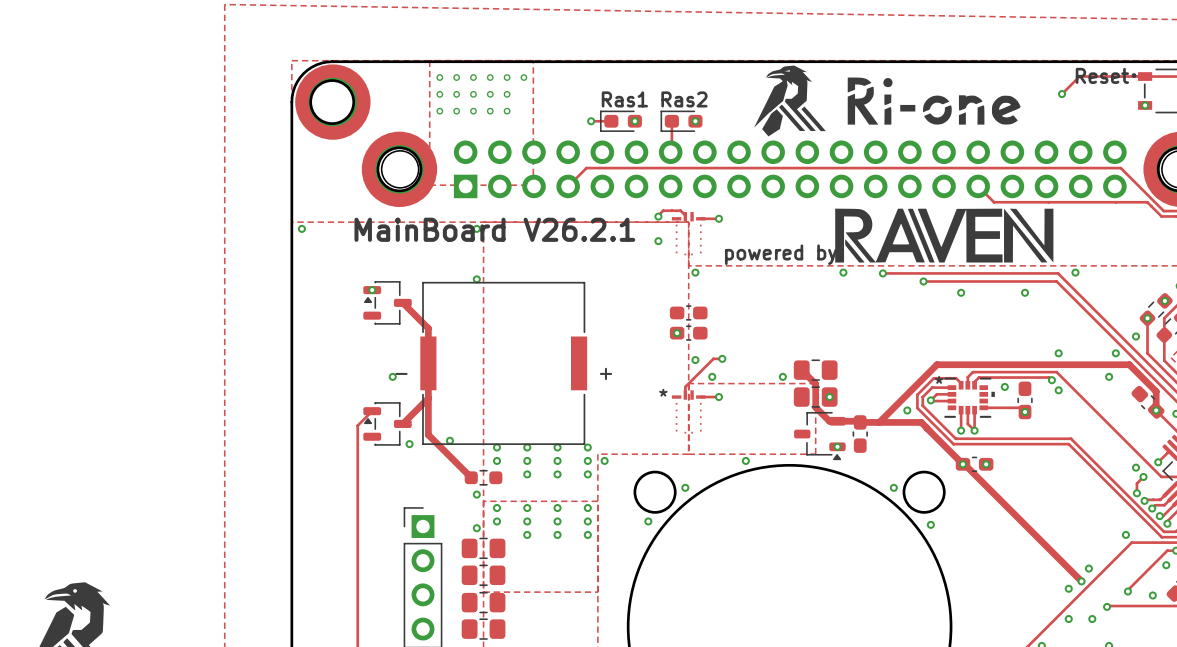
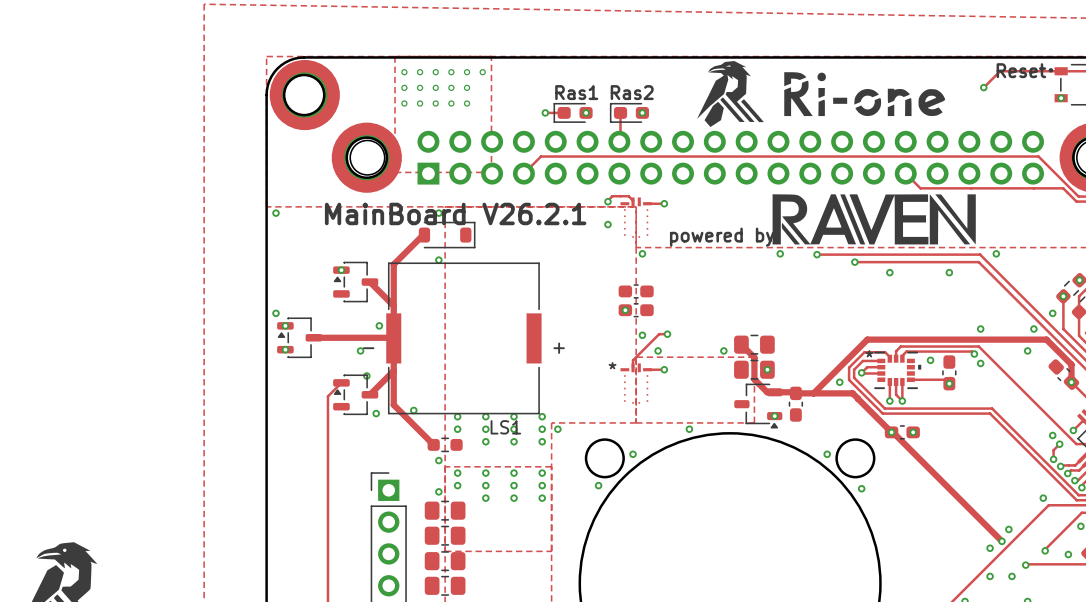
track: none -> (424, 235) (393, 264) (393, 305)
part: none -> (447, 235)
via: none -> (276, 313)
via: none -> (285, 325)
via: none -> (379, 325)
part: none -> (299, 337)
track: none -> (313, 337) (393, 338)
via: none -> (285, 349)
via: none -> (366, 375)
LS1 name: none -> LS1 (505, 427)

